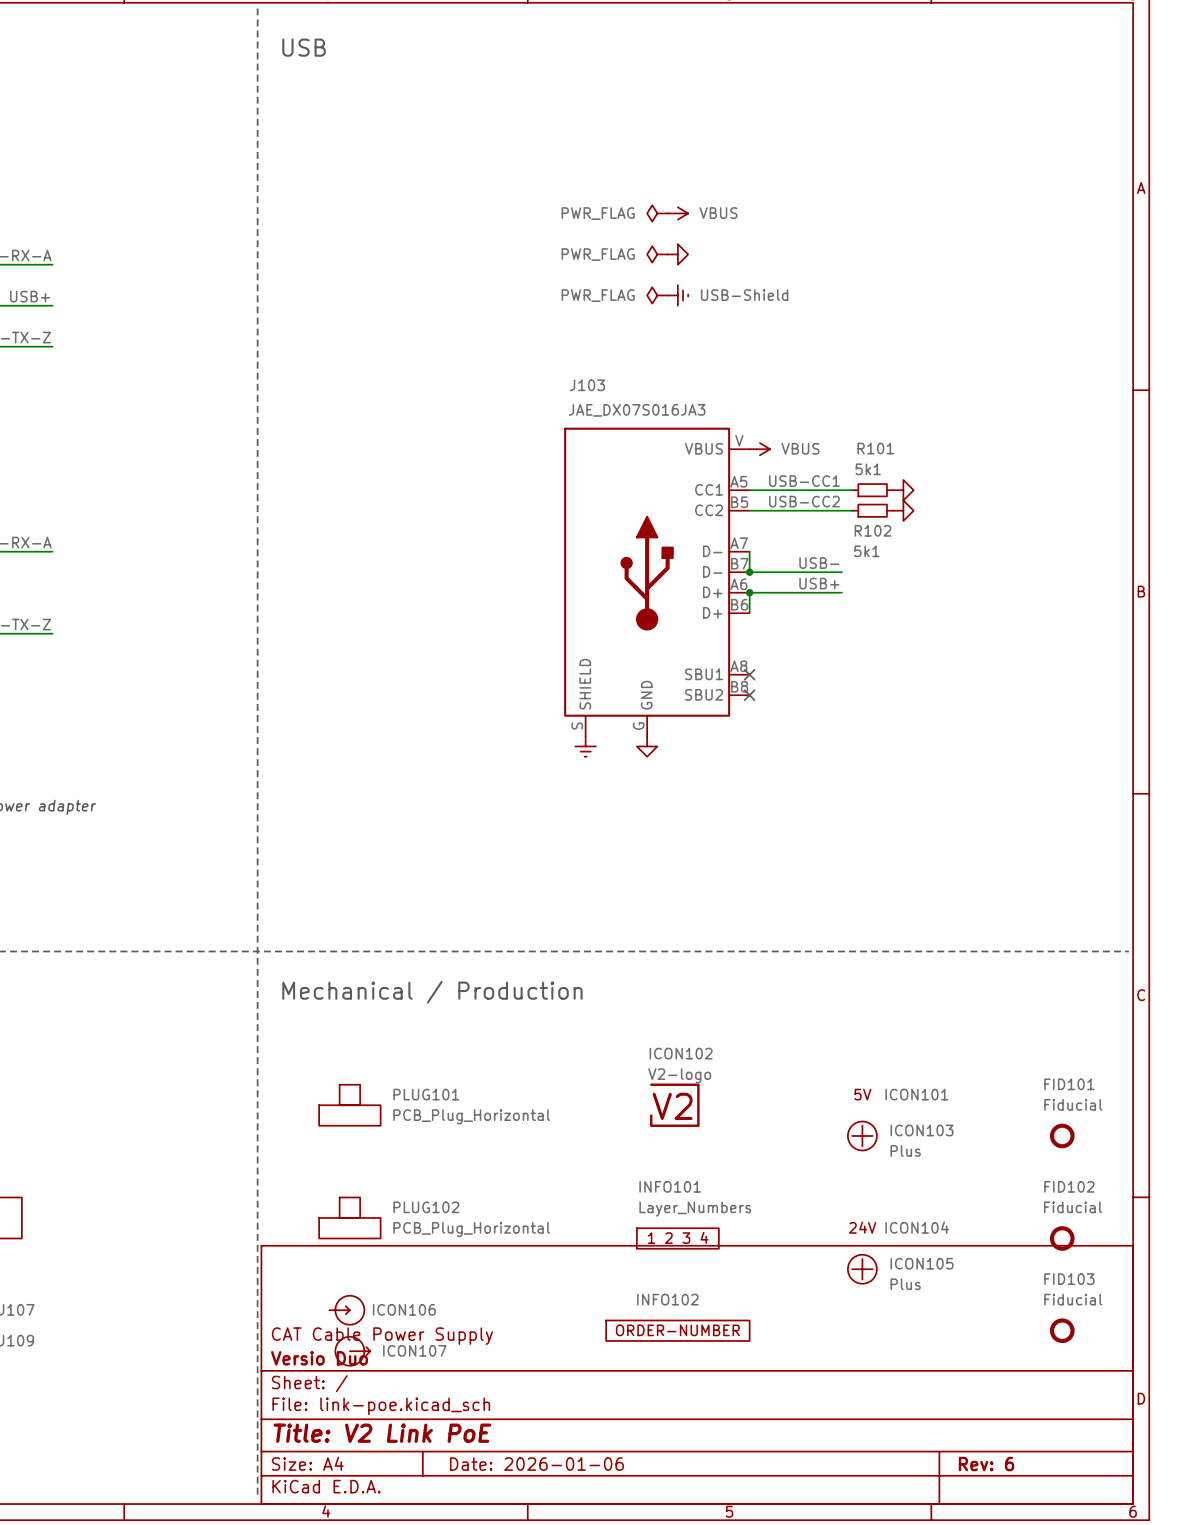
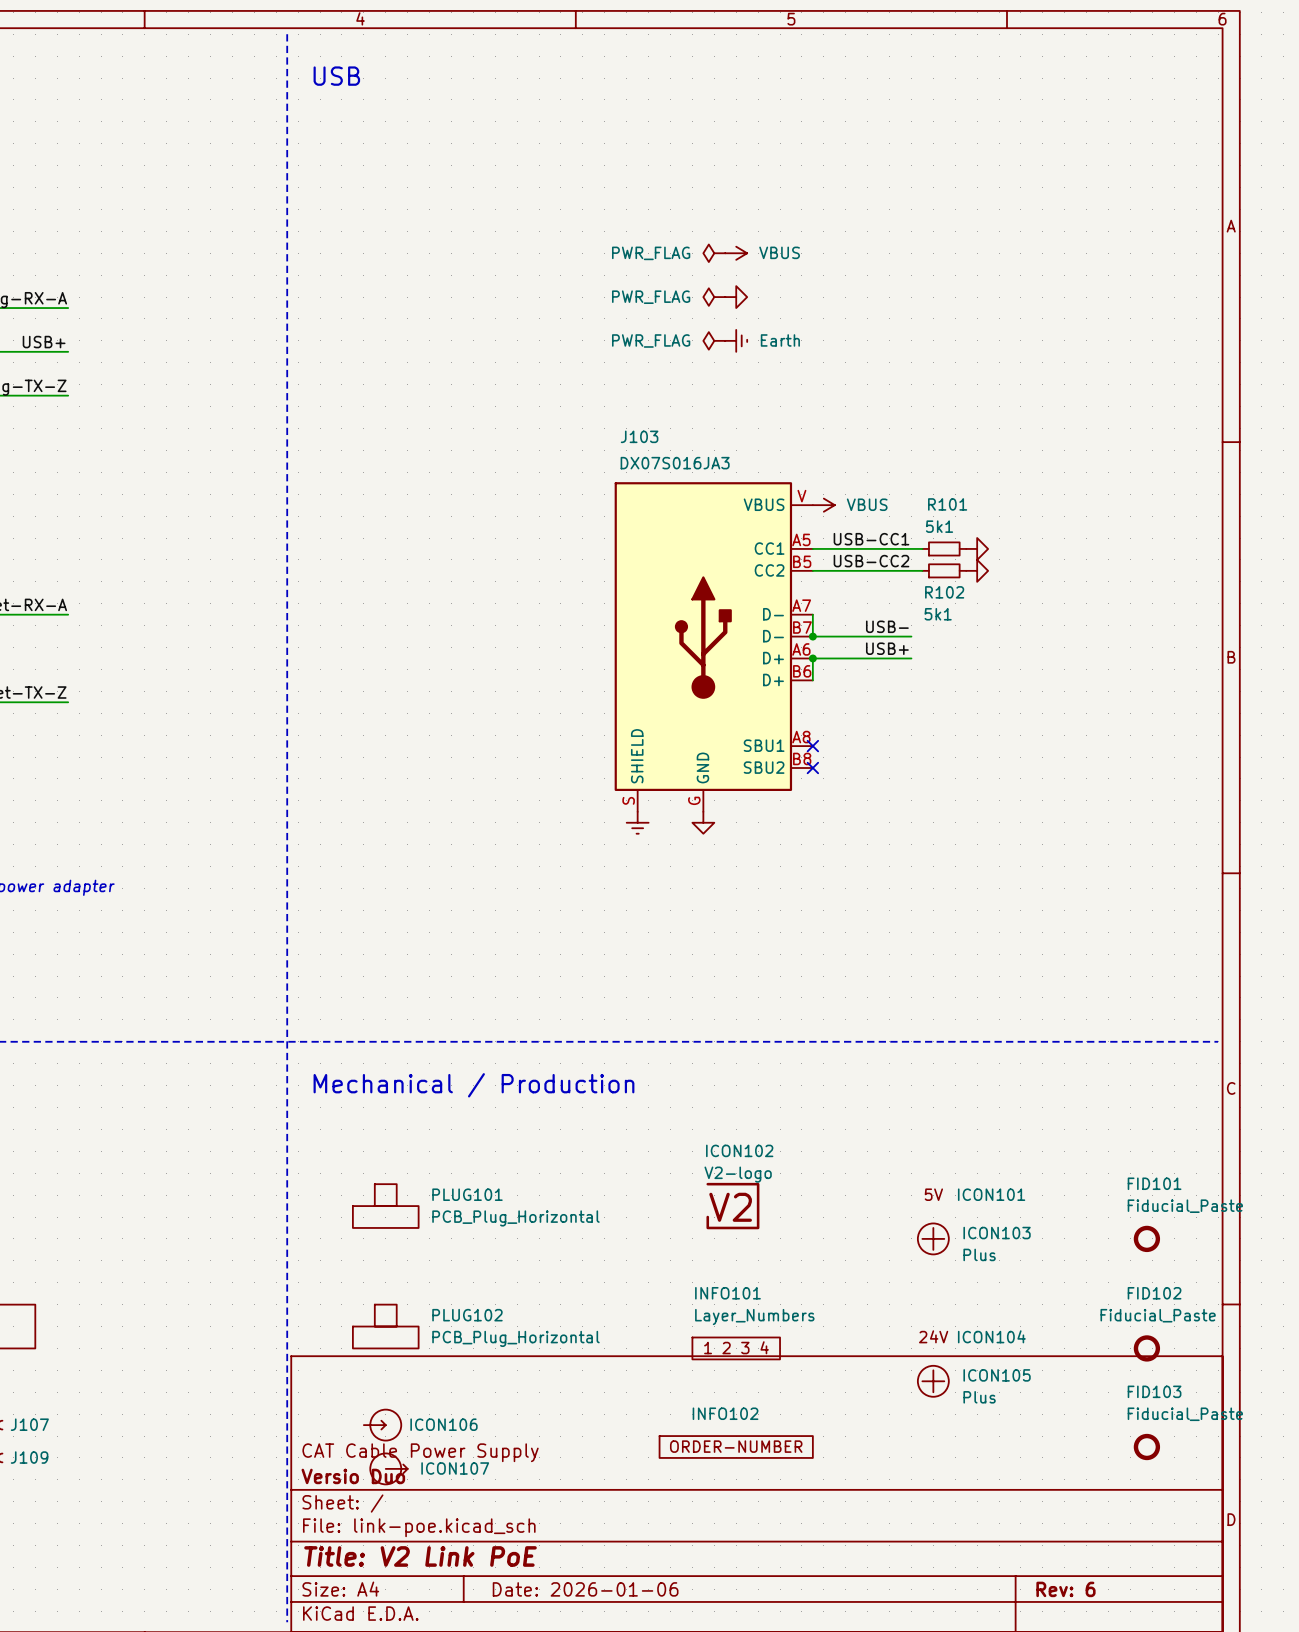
power symbol: USB-Shield (677, 295) -> Earth (736, 340)
J103 value: JAE_DX07S016JA3 (637, 410) -> DX07S016JA3 (675, 463)
FID101 value: Fiducial (1073, 1104) -> Fiducial_Paste (1185, 1206)
FID102 value: Fiducial (1073, 1207) -> Fiducial_Paste (1158, 1315)
FID103 value: Fiducial (1073, 1299) -> Fiducial_Paste (1185, 1414)

